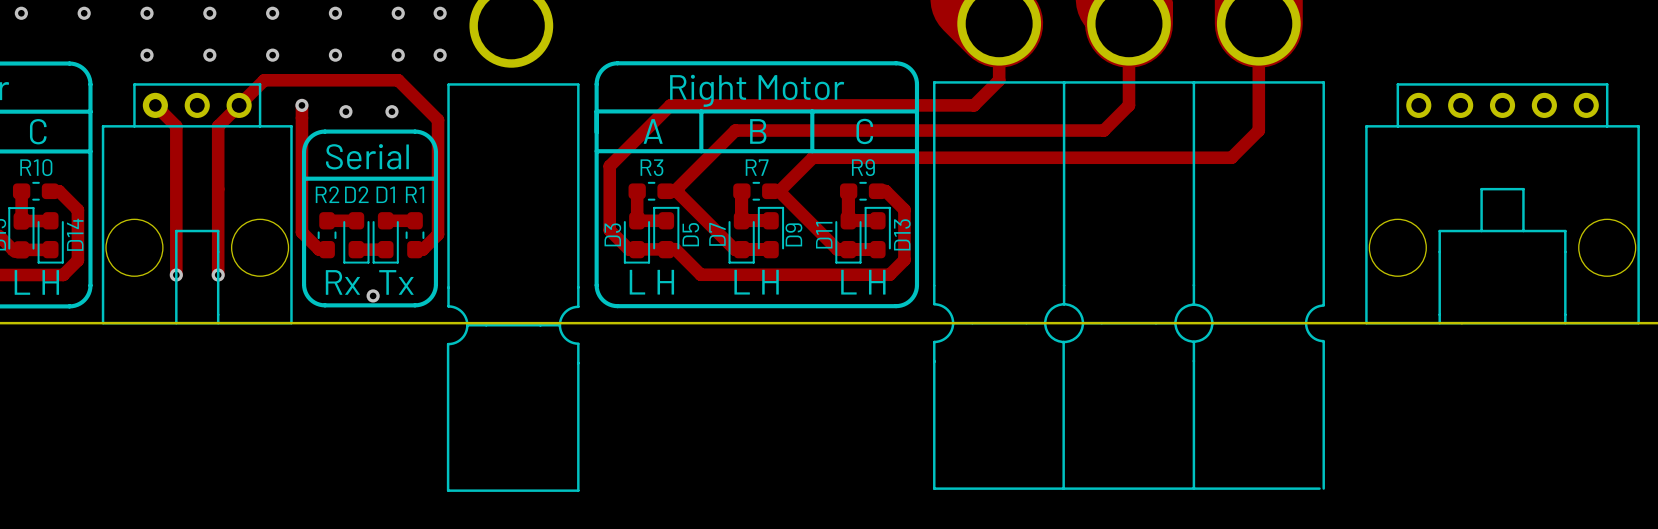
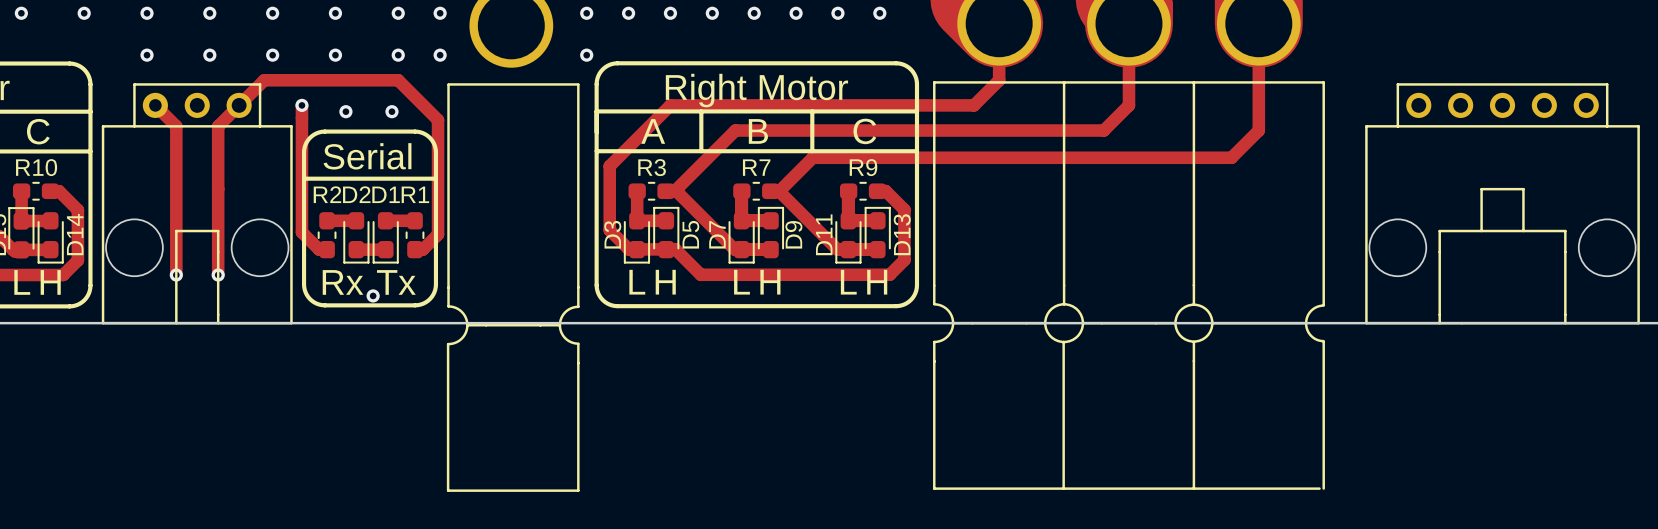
via: none -> (586, 13)
via: none -> (628, 13)
via: none -> (670, 13)
via: none -> (712, 13)
via: none -> (754, 13)
via: none -> (796, 13)
via: none -> (837, 13)
via: none -> (879, 13)
via: none -> (586, 55)

